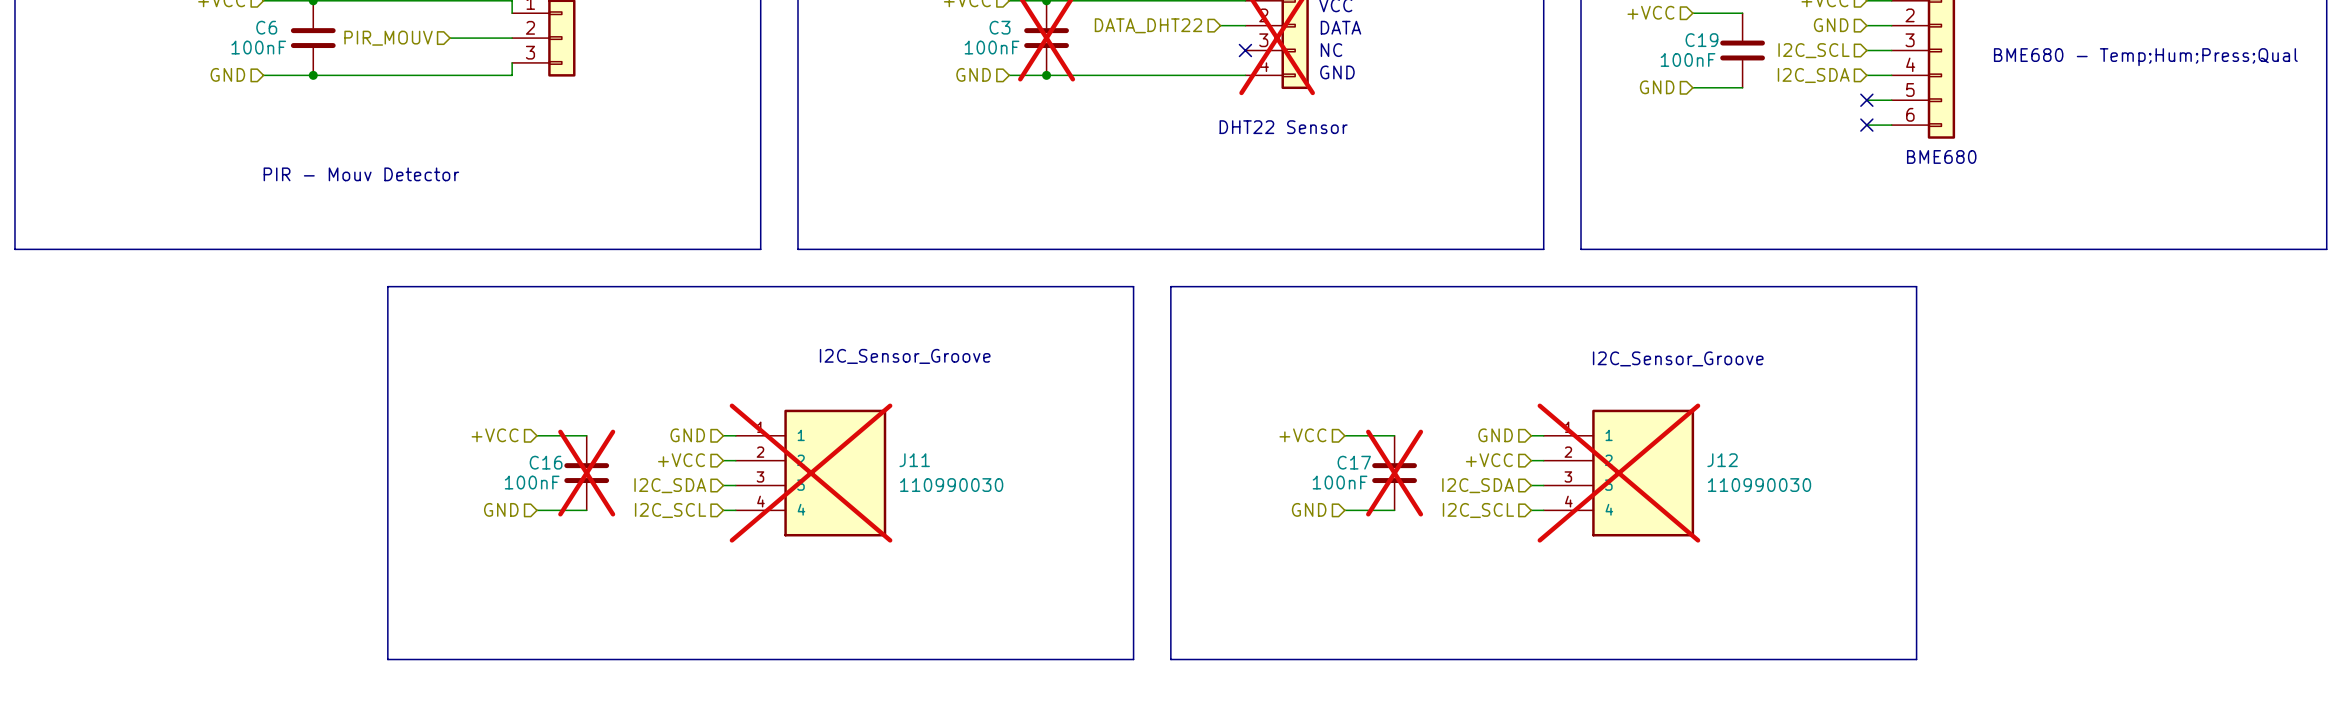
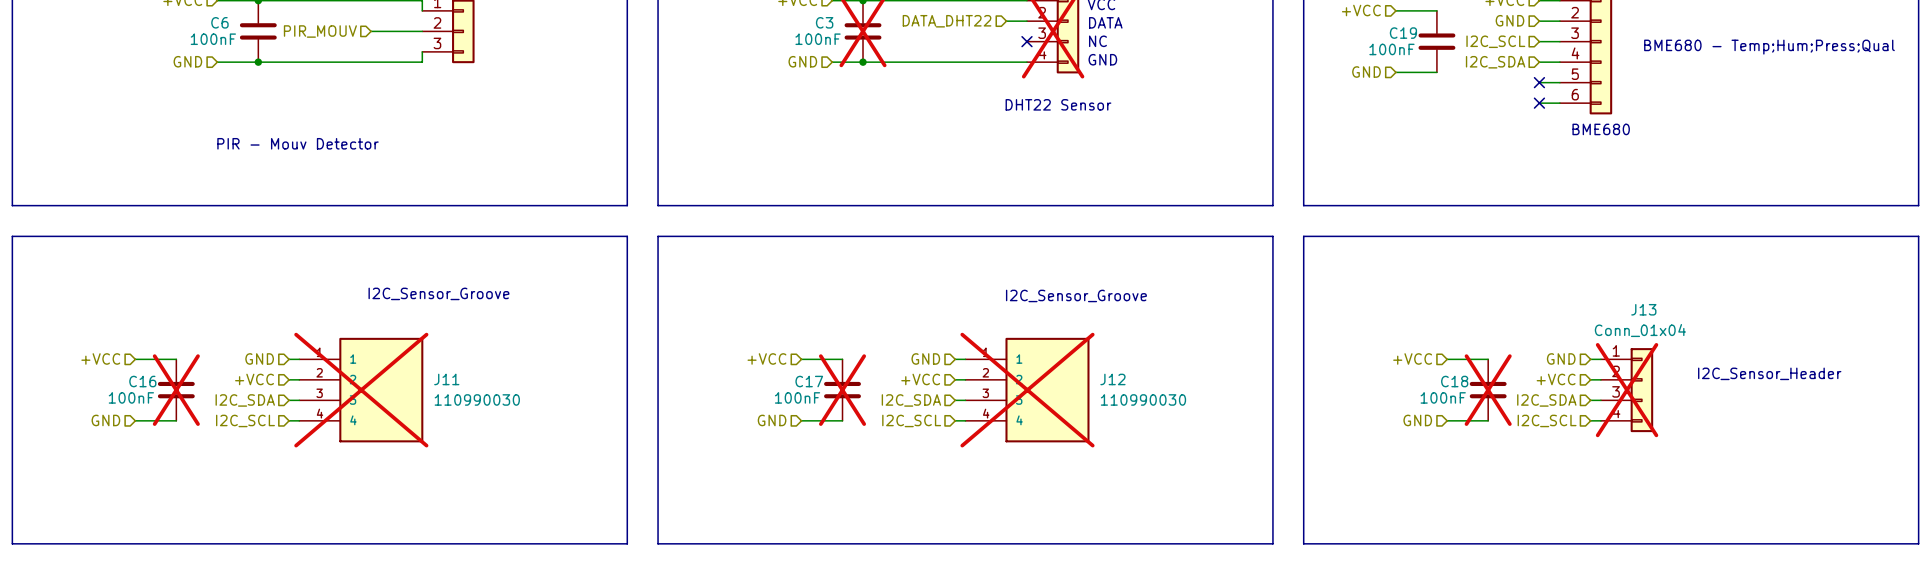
line: (387, 286) (387, 659) -> (319, 236) (12, 236) (12, 543) (319, 543)
line: (760, 286) (797, 286) -> (627, 236) (627, 543)
line: (1133, 286) (1133, 659) -> (934, 236) (965, 236)
line: (1170, 286) (1170, 659) -> (934, 543) (965, 543)
line: (1543, 286) (1581, 286) -> (1272, 236) (1272, 543)
line: (1916, 286) (1916, 659) -> (1580, 236) (1918, 236) (1918, 543) (1580, 543)
text: none -> I2C_Sensor_Groove (438, 293)
text: I2C_Sensor_Groove (905, 356) -> none
text: none -> I2C_Sensor_Groove (1076, 295)
text: I2C_Sensor_Groove (1678, 358) -> none
hierarchical label: none -> +VCC (100, 358)
wire: none -> (135, 359) (176, 359)
hierarchical label: none -> GND (259, 358)
wire: none -> (289, 359) (299, 359)
hierarchical label: +VCC (495, 435) -> none
wire: (536, 435) (586, 435) -> none
hierarchical label: GND (687, 435) -> none
wire: (723, 435) (735, 435) -> none
hierarchical label: none -> +VCC (766, 358)
wire: none -> (801, 359) (842, 359)
hierarchical label: none -> GND (925, 358)
wire: none -> (955, 359) (965, 359)
hierarchical label: +VCC (1302, 435) -> none
wire: (1344, 435) (1394, 435) -> none
hierarchical label: GND (1495, 435) -> none
wire: (1531, 435) (1543, 435) -> none
hierarchical label: none -> +VCC (1412, 358)
wire: none -> (1447, 359) (1488, 359)
hierarchical label: none -> GND (1561, 358)
wire: none -> (1590, 359) (1600, 359)
text: none -> I2C_Sensor_Header (1769, 373)
hierarchical label: none -> +VCC (254, 379)
wire: none -> (289, 379) (299, 379)
hierarchical label: +VCC (681, 460) -> none
wire: (723, 460) (735, 460) -> none
hierarchical label: none -> +VCC (920, 379)
wire: none -> (955, 379) (965, 379)
hierarchical label: +VCC (1489, 460) -> none
wire: (1531, 460) (1543, 460) -> none
hierarchical label: none -> +VCC (1556, 379)
wire: none -> (1590, 379) (1600, 379)
C16 position: (586, 473) -> (176, 390)
J11 position: (811, 473) -> (361, 390)
C17 position: (1394, 473) -> (842, 390)
J12 position: (1618, 473) -> (1027, 390)
C18: none -> 100nF (1488, 390)
J13: none -> Conn_01x04 (1627, 390)
hierarchical label: none -> I2C_SDA (245, 400)
wire: none -> (289, 400) (299, 400)
hierarchical label: I2C_SDA (670, 485) -> none
wire: (723, 485) (735, 485) -> none
hierarchical label: none -> I2C_SDA (911, 400)
wire: none -> (955, 400) (965, 400)
hierarchical label: I2C_SDA (1478, 485) -> none
wire: (1531, 485) (1543, 485) -> none
hierarchical label: none -> I2C_SDA (1546, 400)
wire: none -> (1590, 400) (1600, 400)
hierarchical label: none -> GND (105, 420)
hierarchical label: GND (501, 509) -> none
hierarchical label: none -> GND (772, 420)
hierarchical label: GND (1309, 509) -> none
hierarchical label: none -> GND (1417, 420)
wire: none -> (135, 420) (176, 420)
hierarchical label: none -> I2C_SCL (245, 420)
wire: none -> (289, 420) (299, 420)
wire: (536, 510) (586, 510) -> none
hierarchical label: I2C_SCL (670, 510) -> none
wire: (723, 510) (735, 510) -> none
wire: none -> (801, 420) (842, 420)
hierarchical label: none -> I2C_SCL (911, 420)
wire: none -> (955, 420) (965, 420)
wire: (1344, 510) (1394, 510) -> none
hierarchical label: I2C_SCL (1478, 510) -> none
wire: (1531, 510) (1543, 510) -> none
wire: none -> (1447, 420) (1488, 420)
hierarchical label: none -> I2C_SCL (1547, 420)
wire: none -> (1590, 420) (1600, 420)
line: (760, 659) (797, 659) -> (658, 236) (658, 543)
line: (1543, 659) (1581, 659) -> (1303, 236) (1303, 543)

